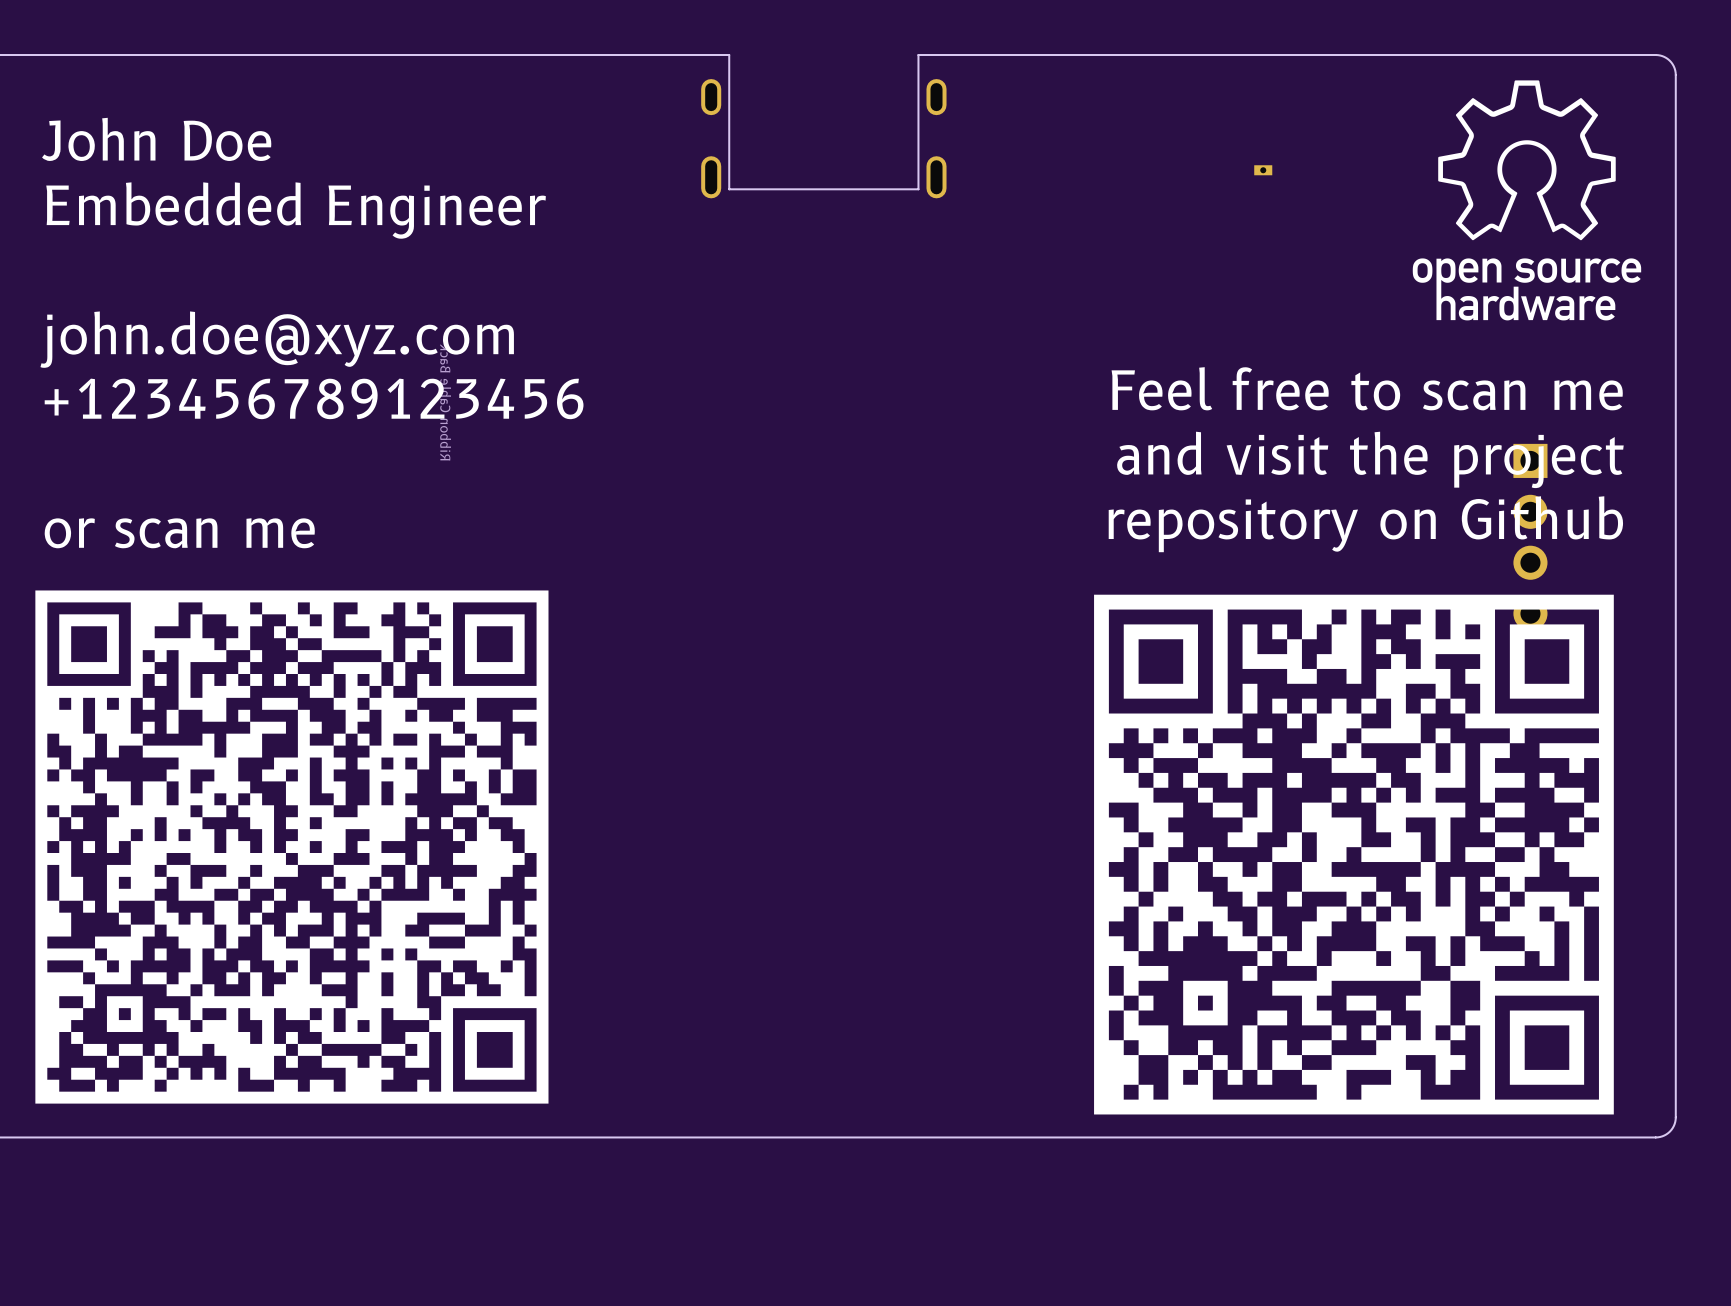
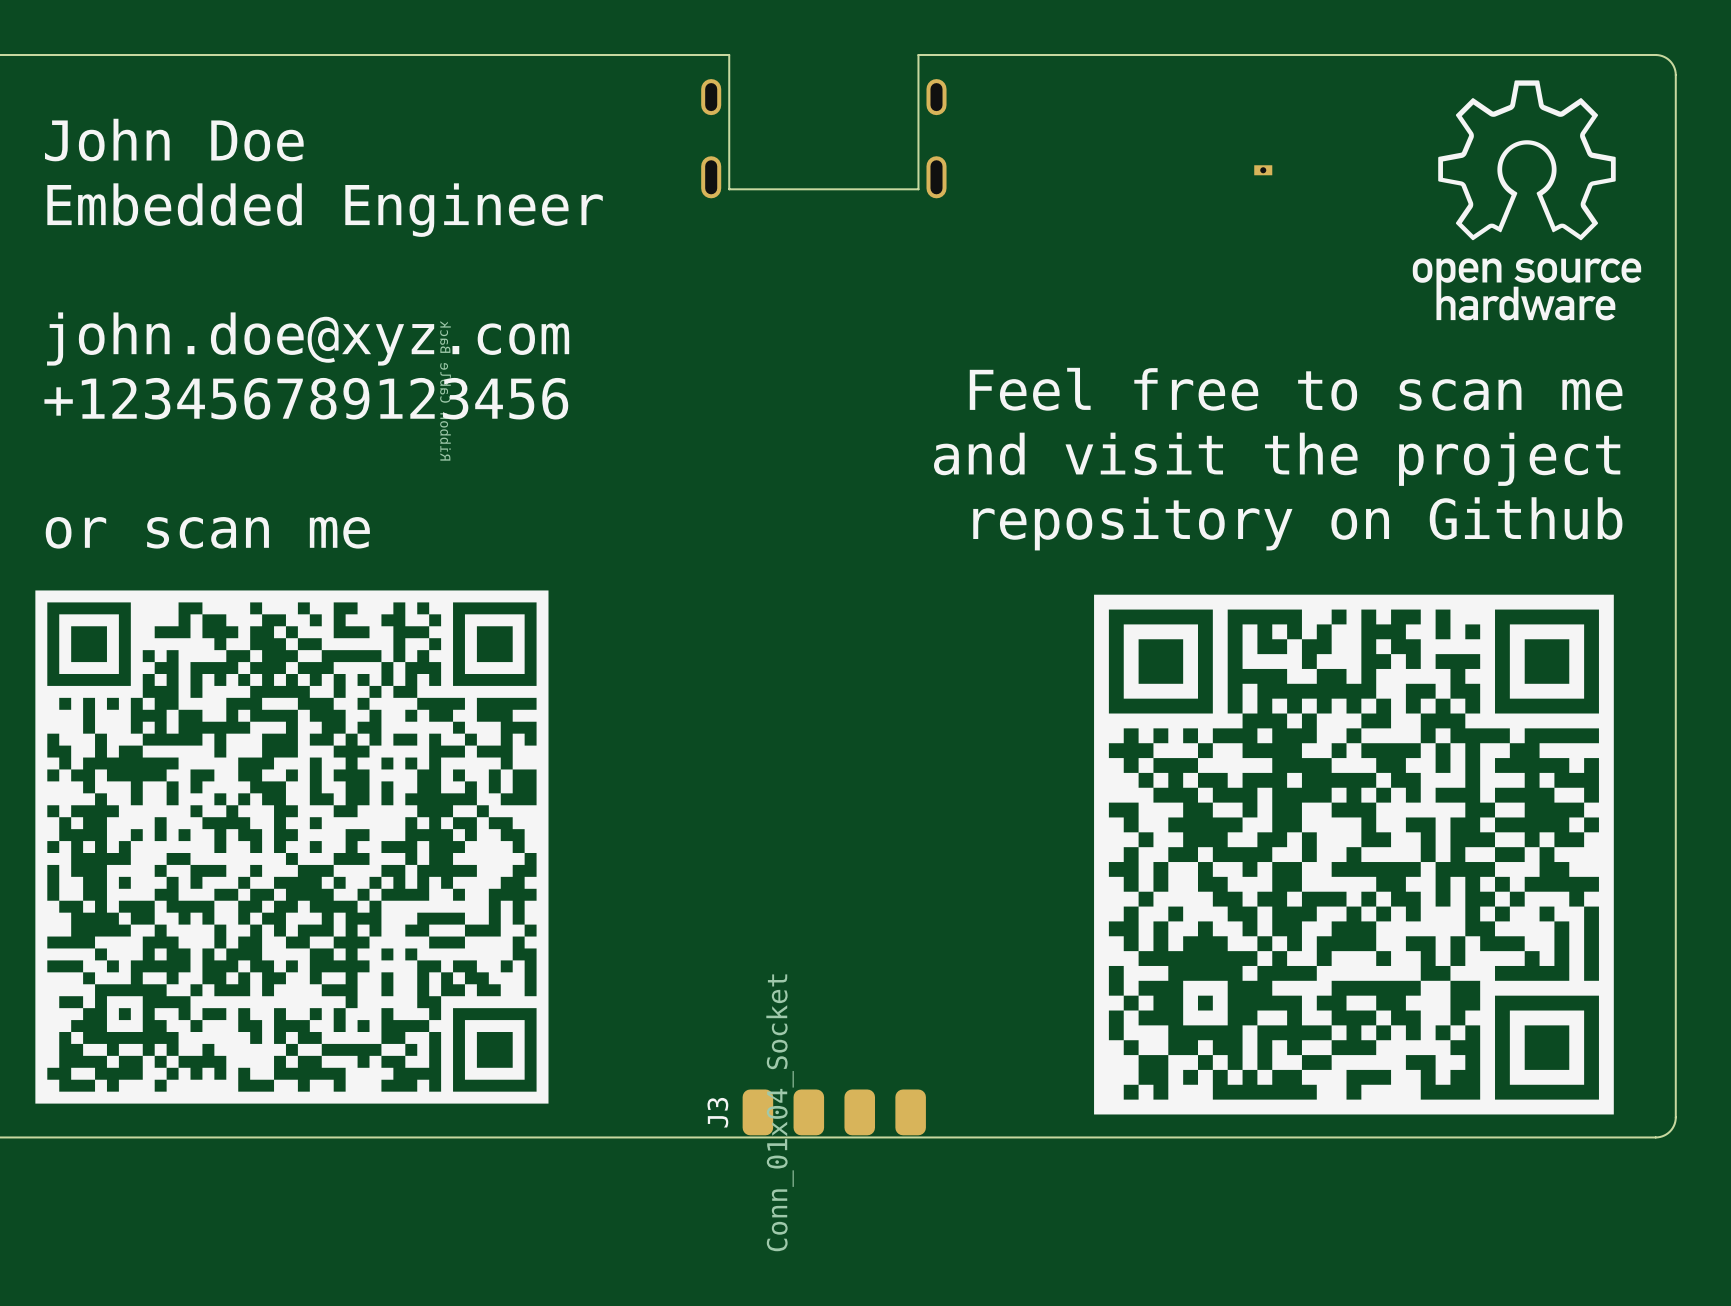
part: (1530, 537) -> none
J3: none -> Conn_01x04_Socket (834, 1112)

